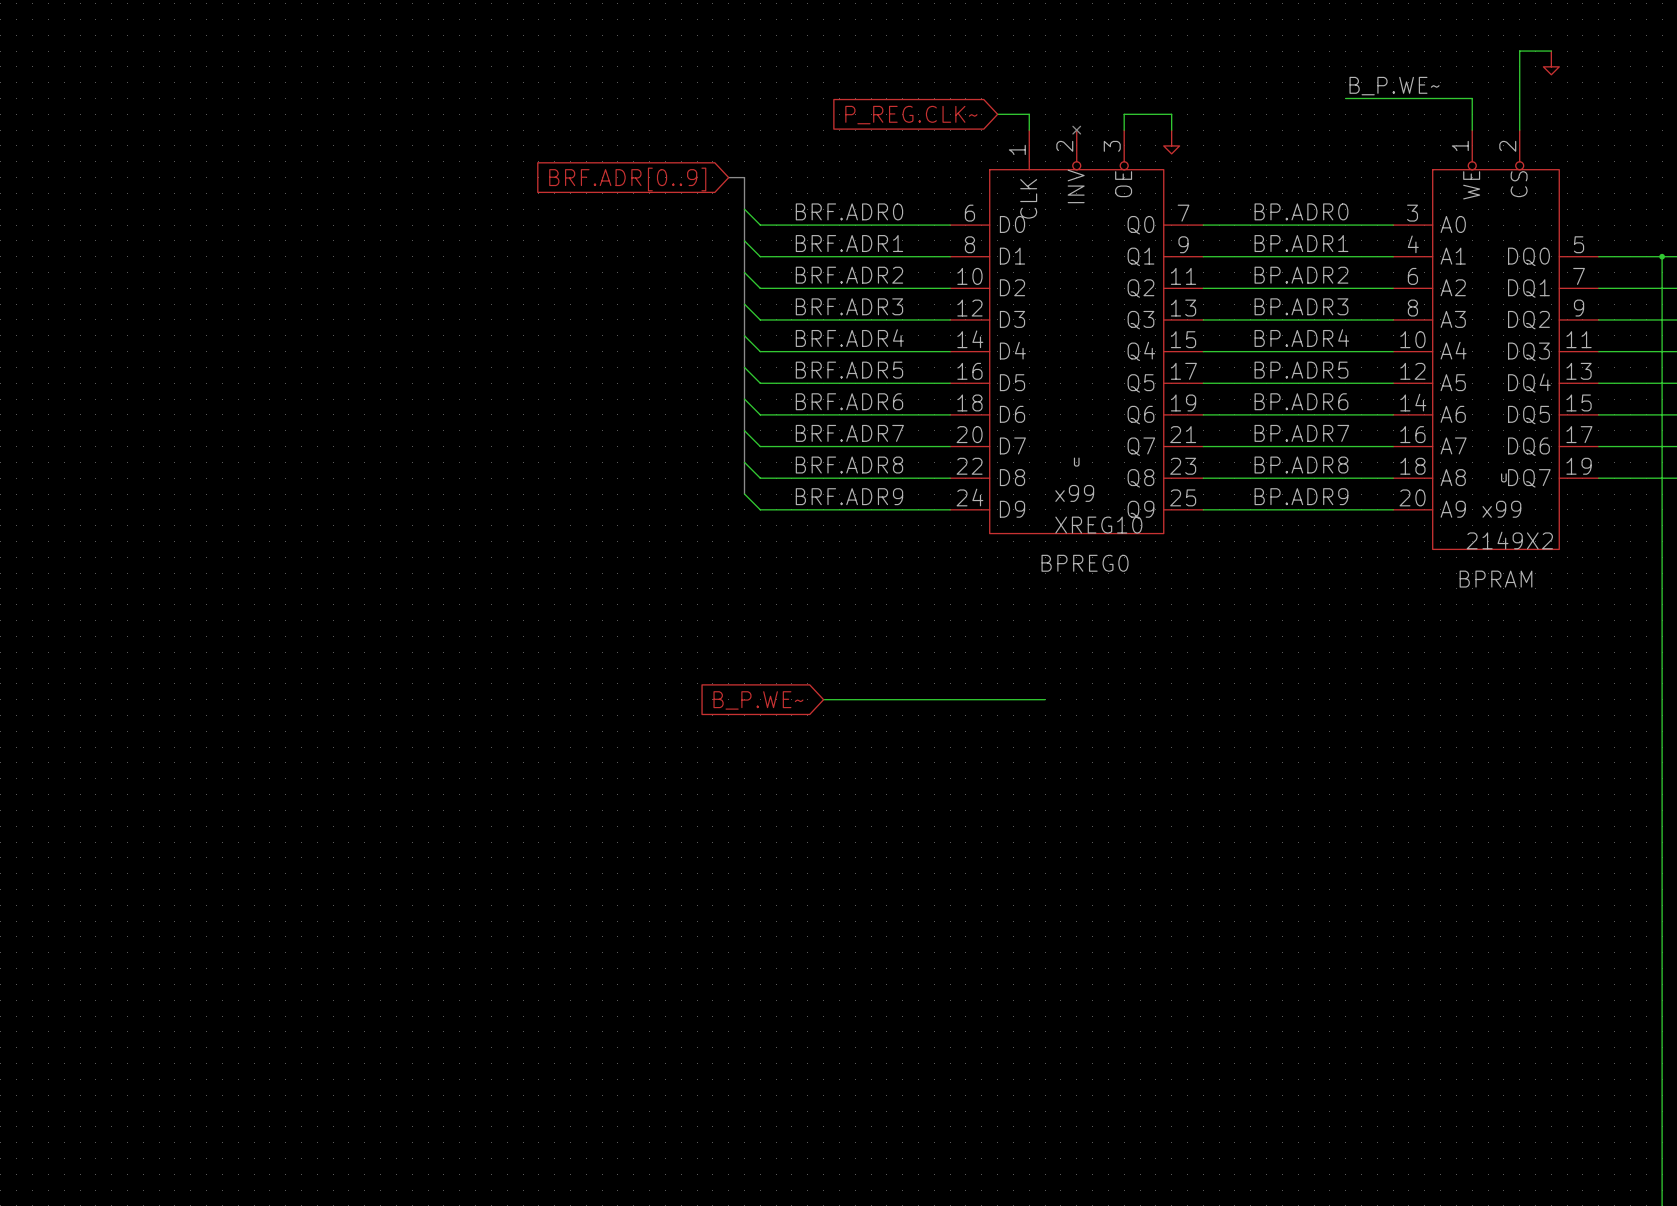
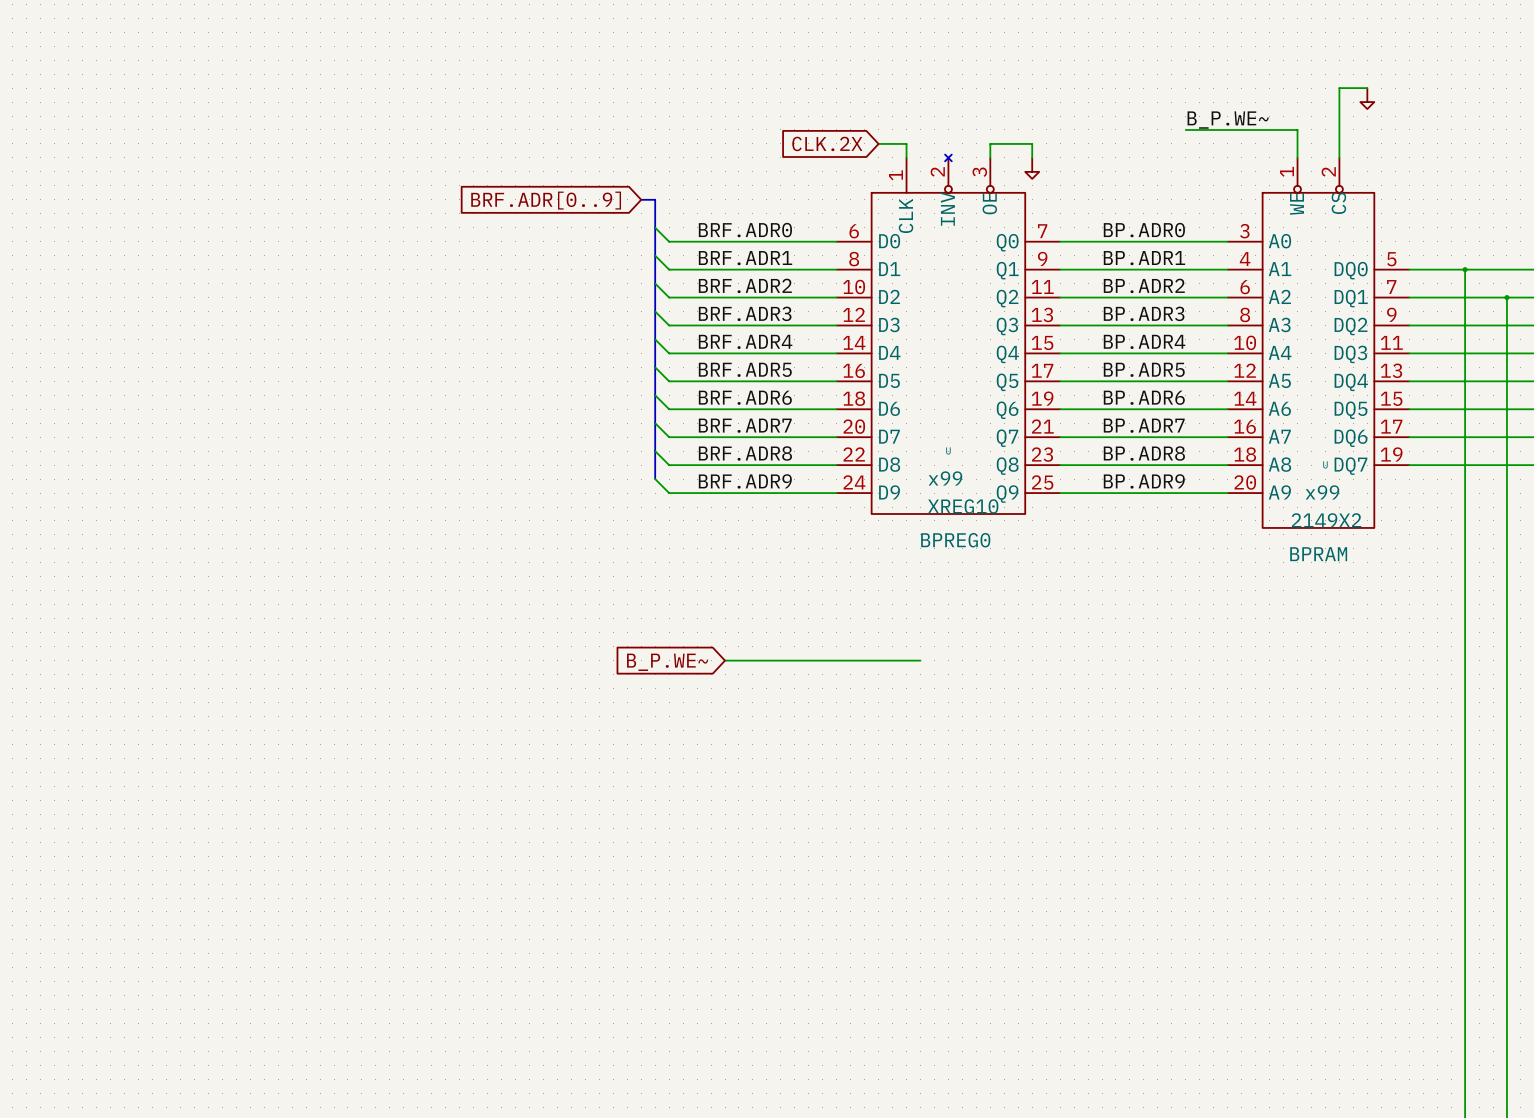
global label: P_REG.CLK~ (911, 115) -> CLK.2X (827, 143)

